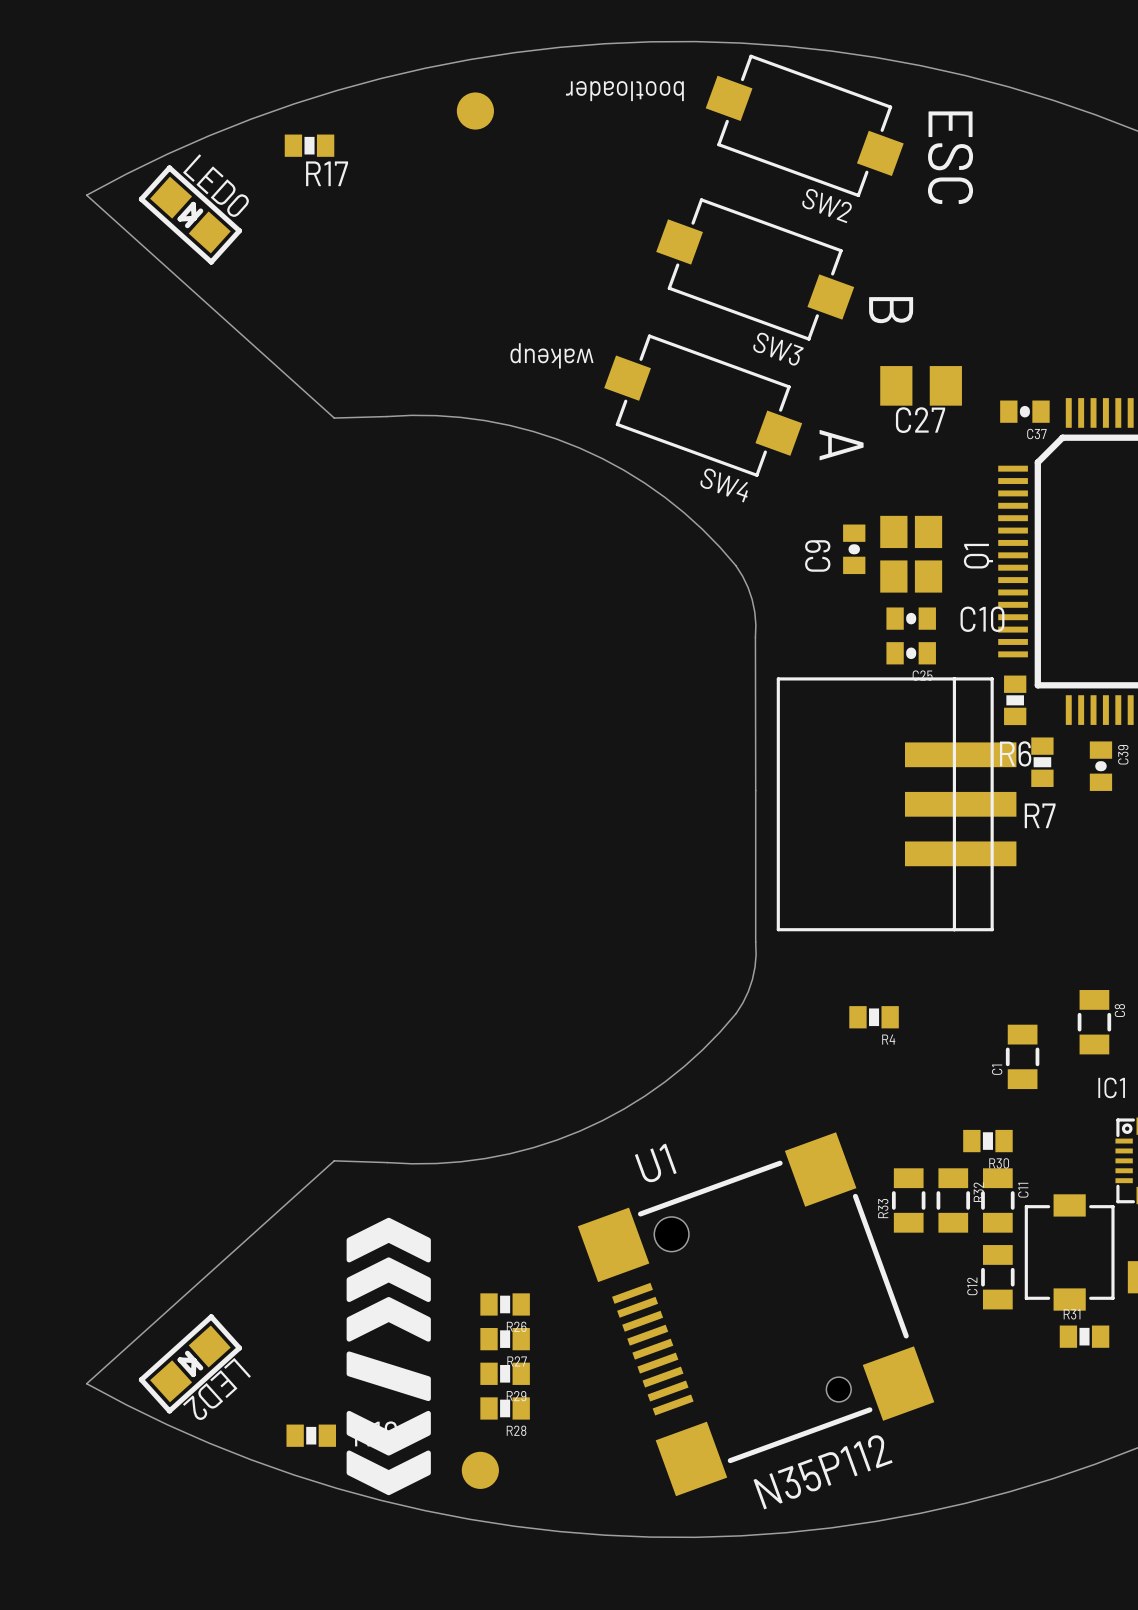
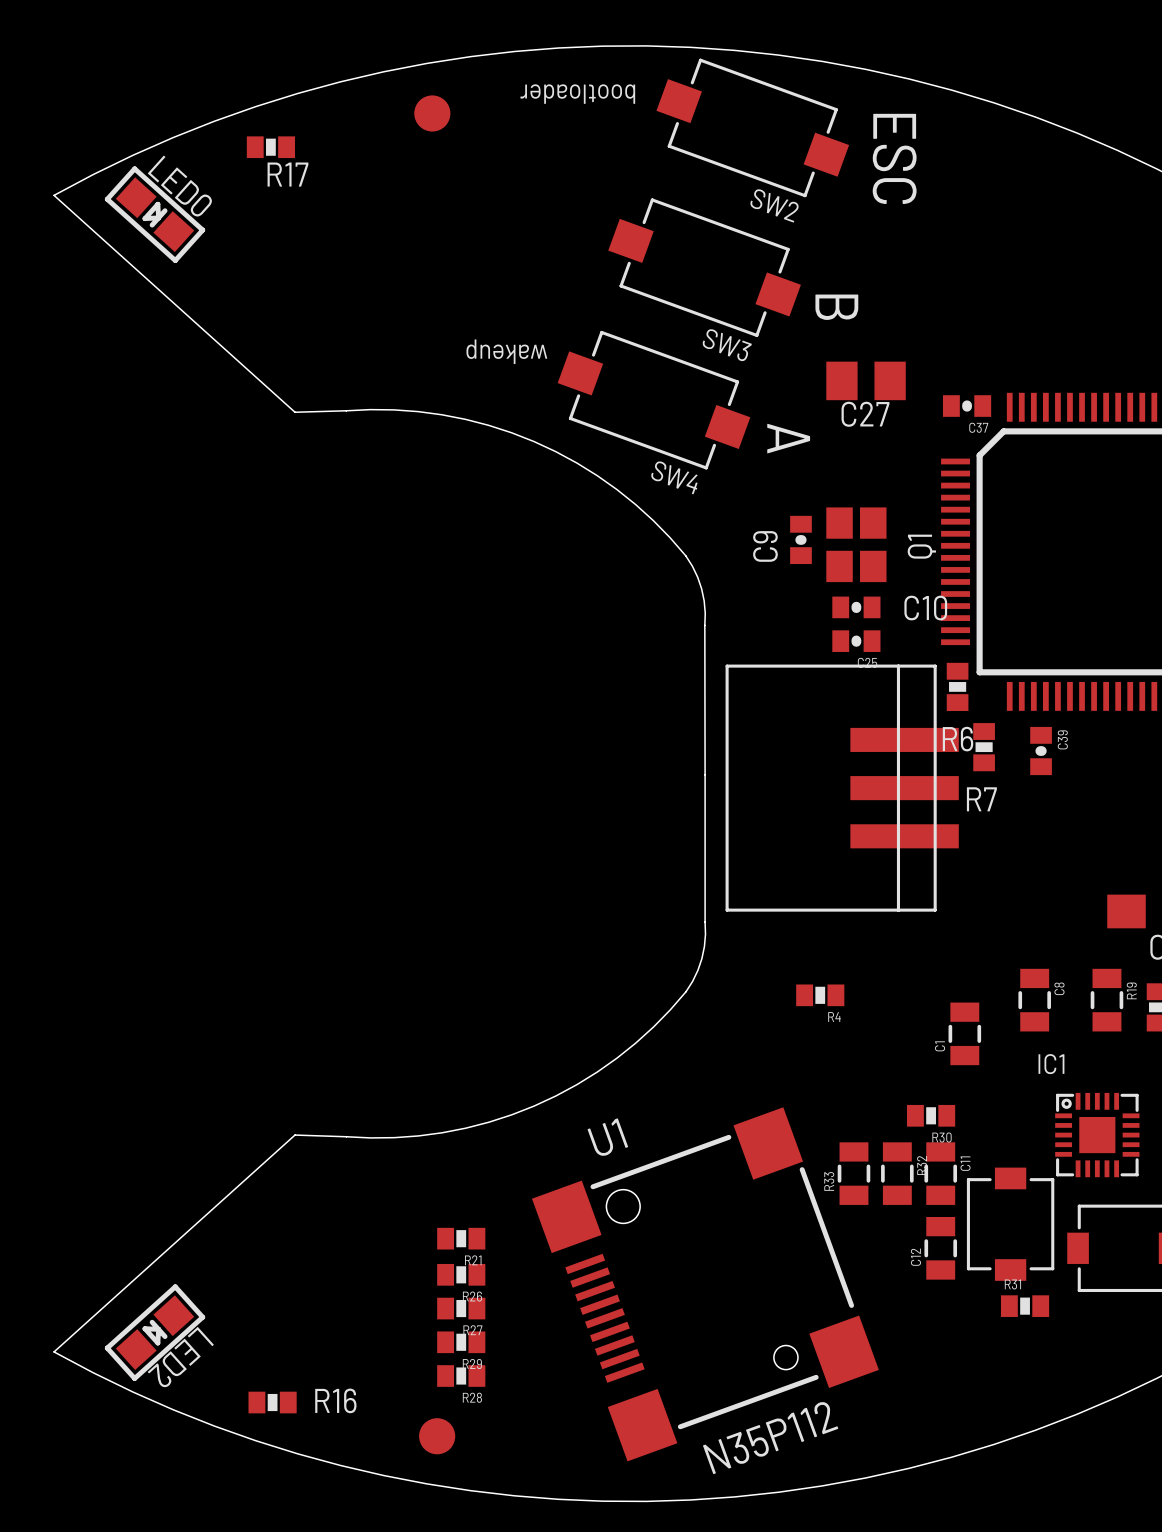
drawing: [346, 1217, 431, 1496] -> none
R21: none -> (461, 1238)

